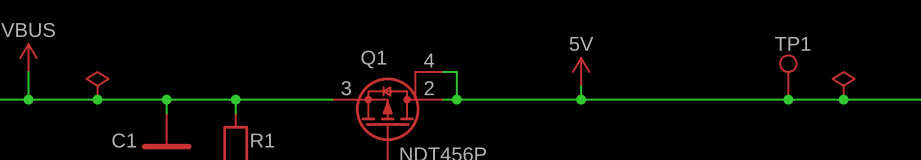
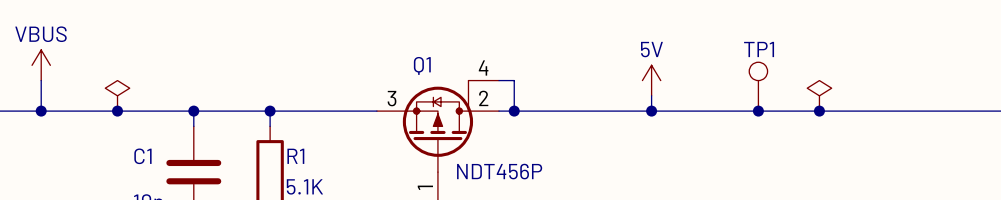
TP1 position: (788, 77) -> (758, 86)
power symbol position: (843, 85) -> (819, 95)
junction: none -> (758, 111)
junction: none -> (819, 111)
junction: (788, 99) -> none
junction: (843, 99) -> none

